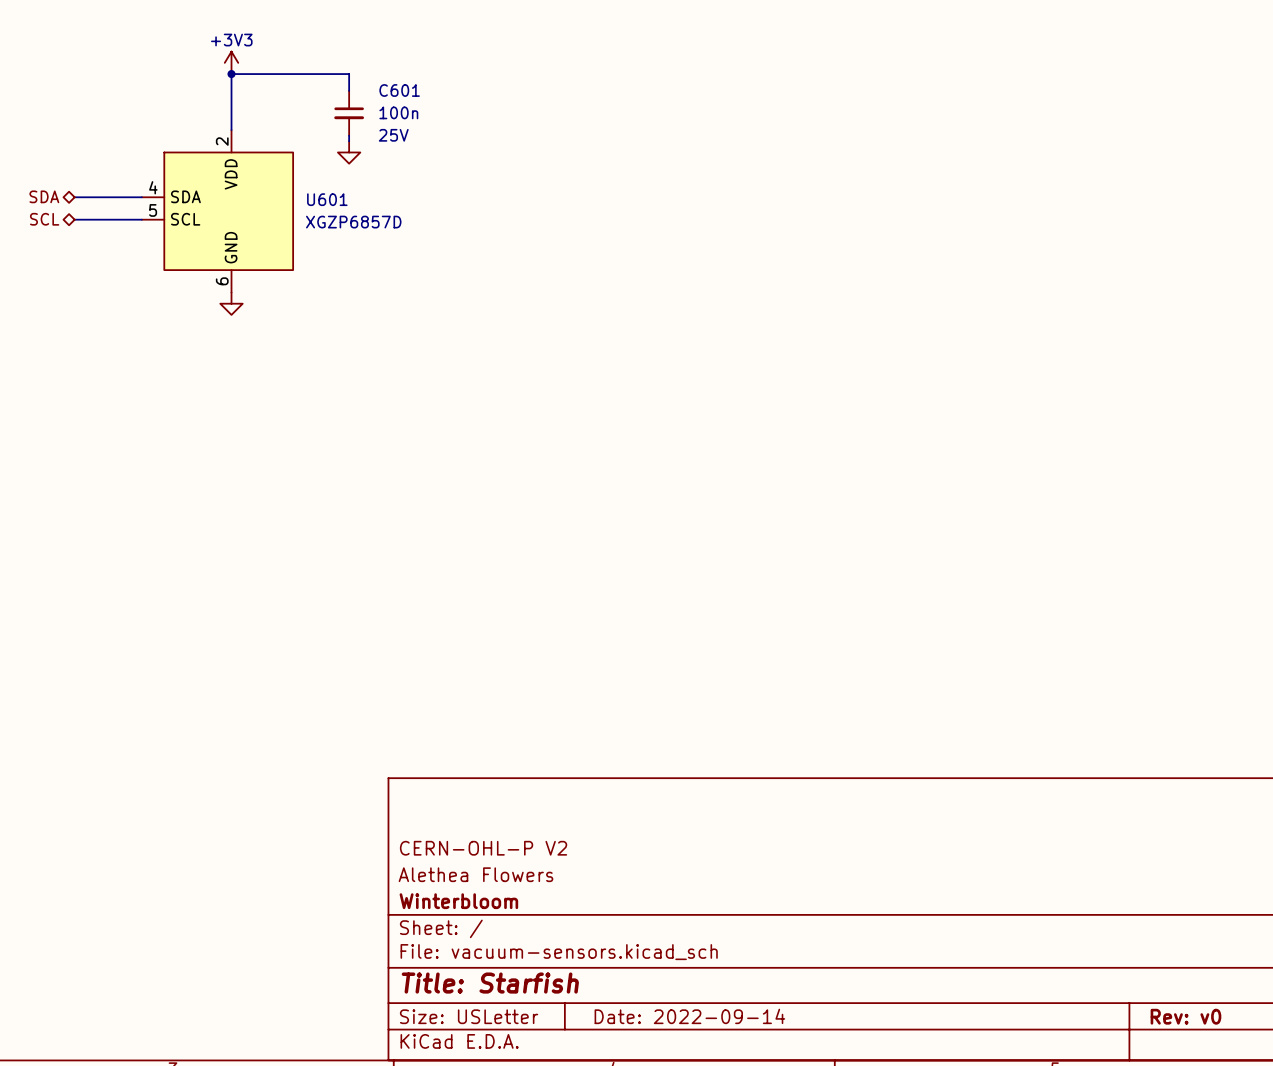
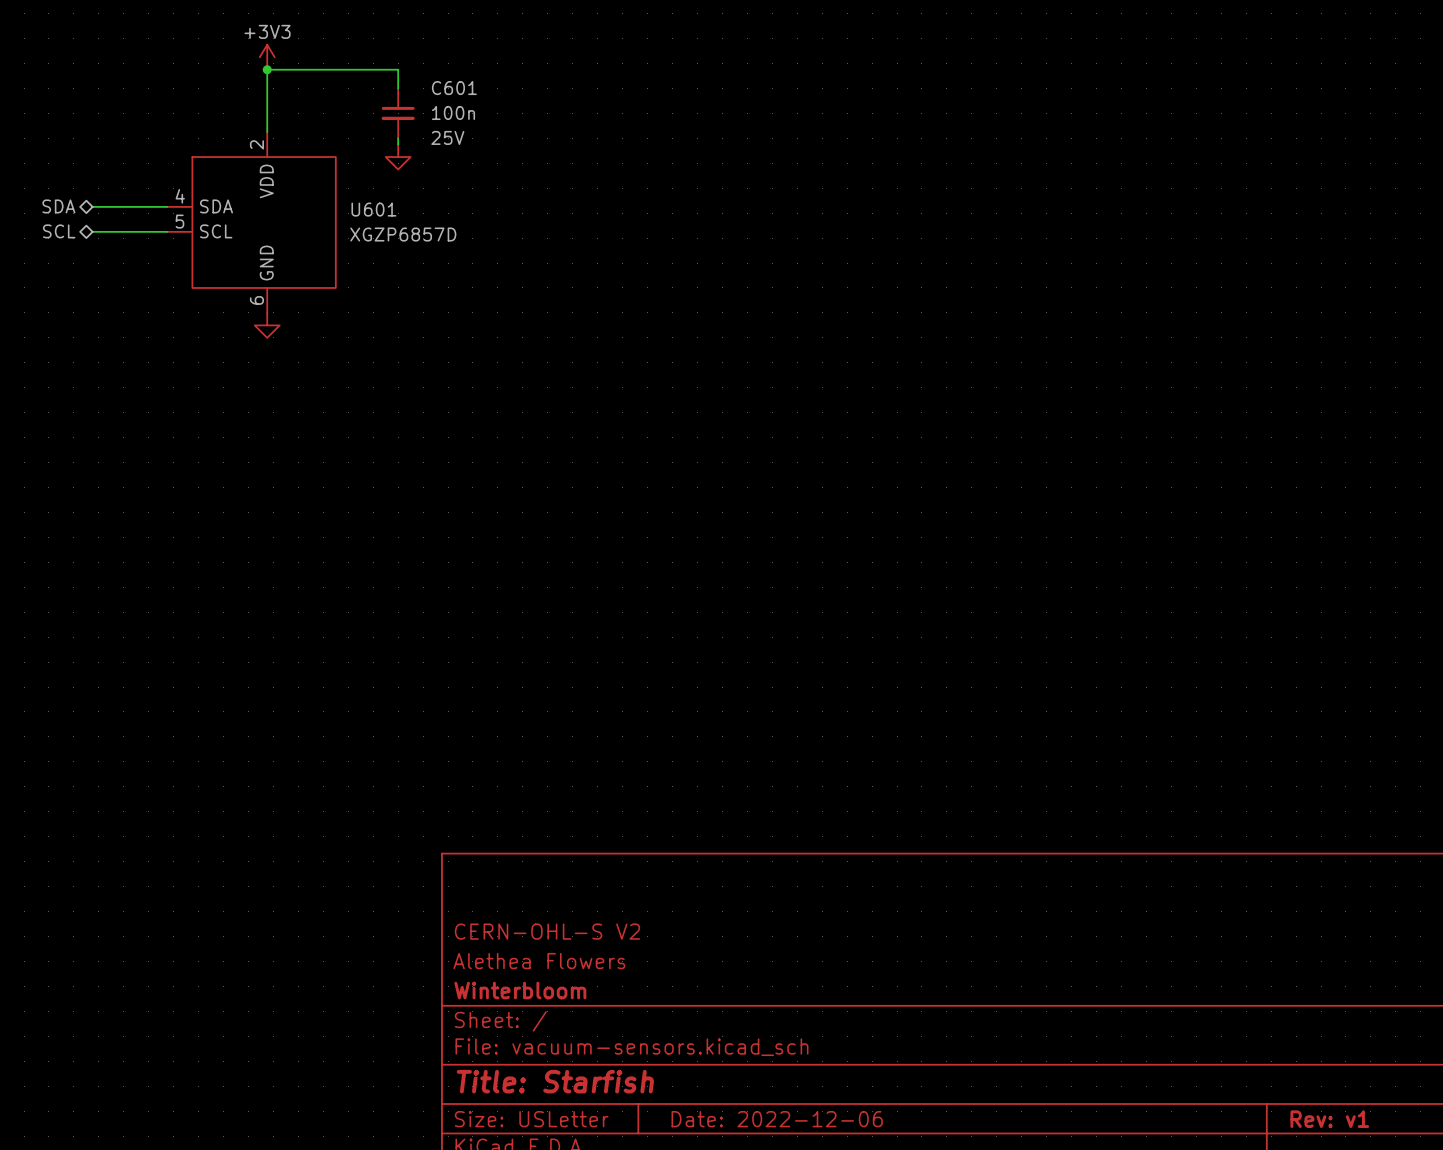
title block: CERN-OHL-P V2 (483, 848) -> CERN-OHL-S V2 (547, 931)
title block: Date: 2022-09-14 (689, 1016) -> Date: 2022-12-06 (777, 1119)
title block: Rev: v0 (1185, 1016) -> Rev: v1 (1329, 1119)

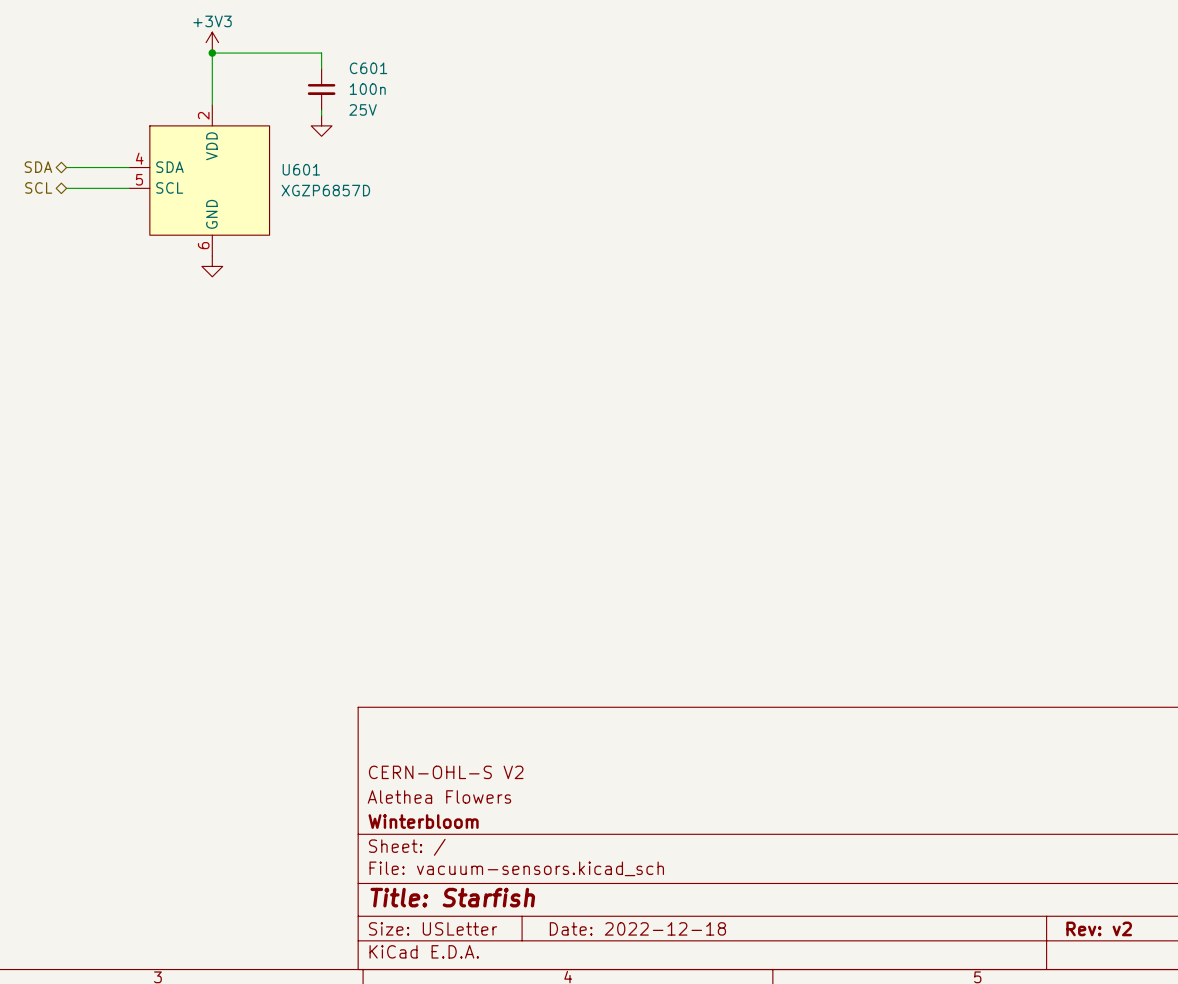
title block: Date: 2022-12-06 (777, 1119) -> Date: 2022-12-18 (637, 928)
title block: Rev: v1 (1329, 1119) -> Rev: v2 (1099, 928)

